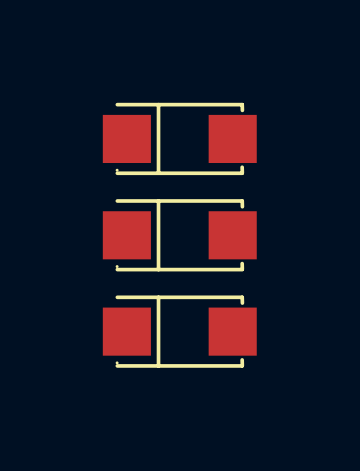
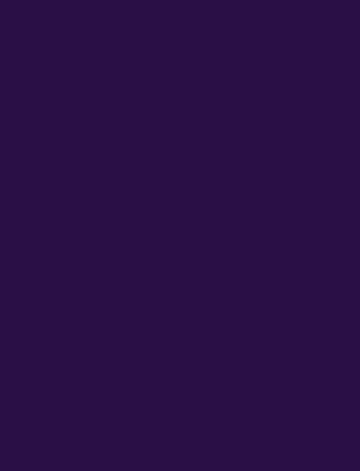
part: (179, 138) -> none
part: (179, 235) -> none
part: (179, 331) -> none

